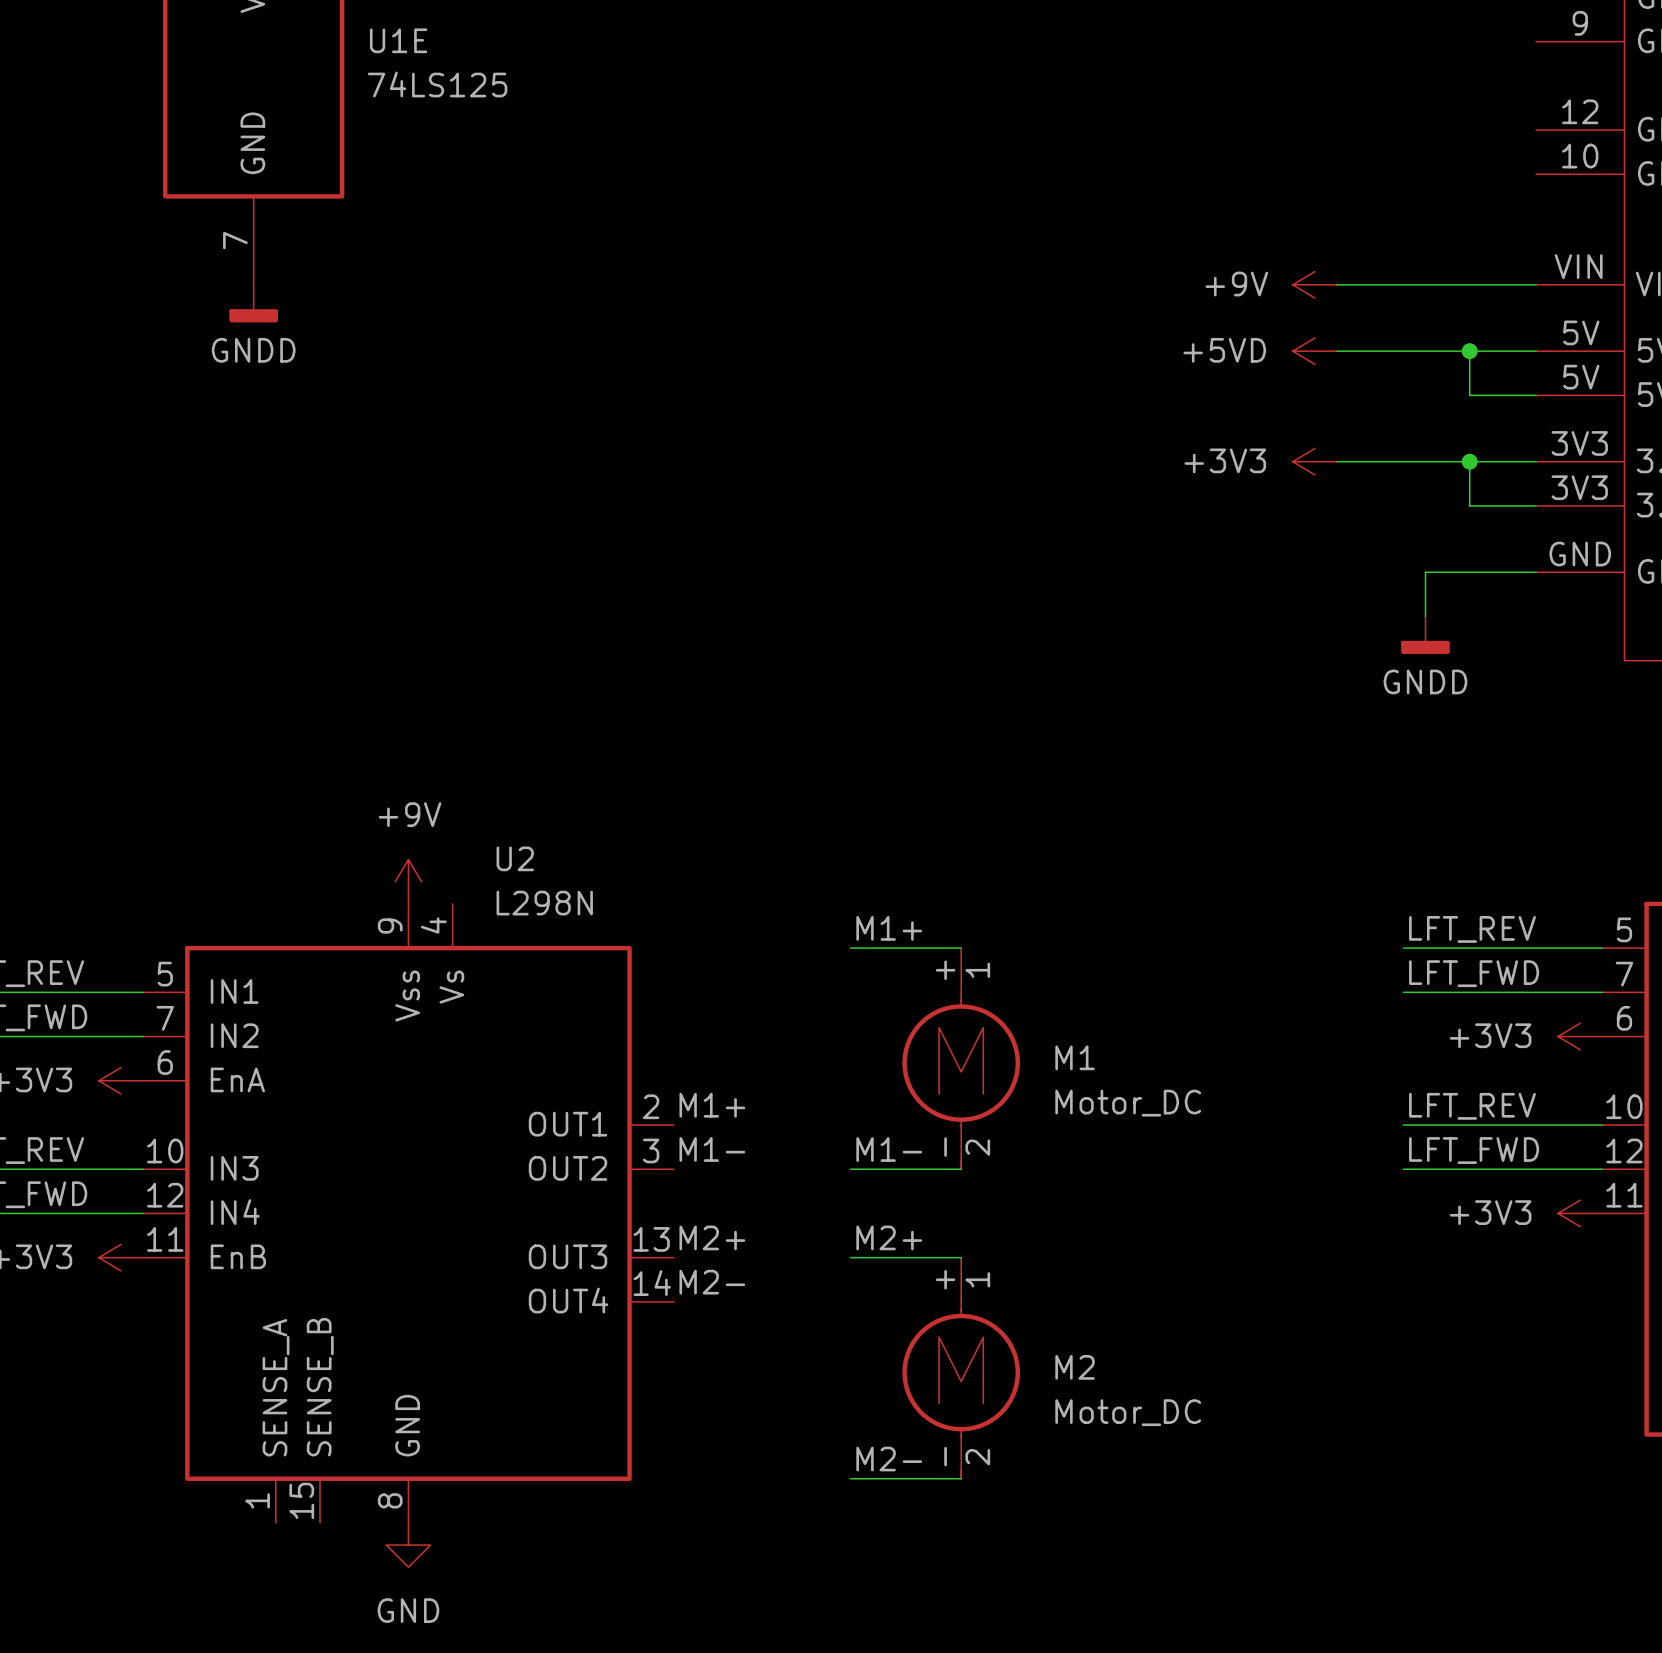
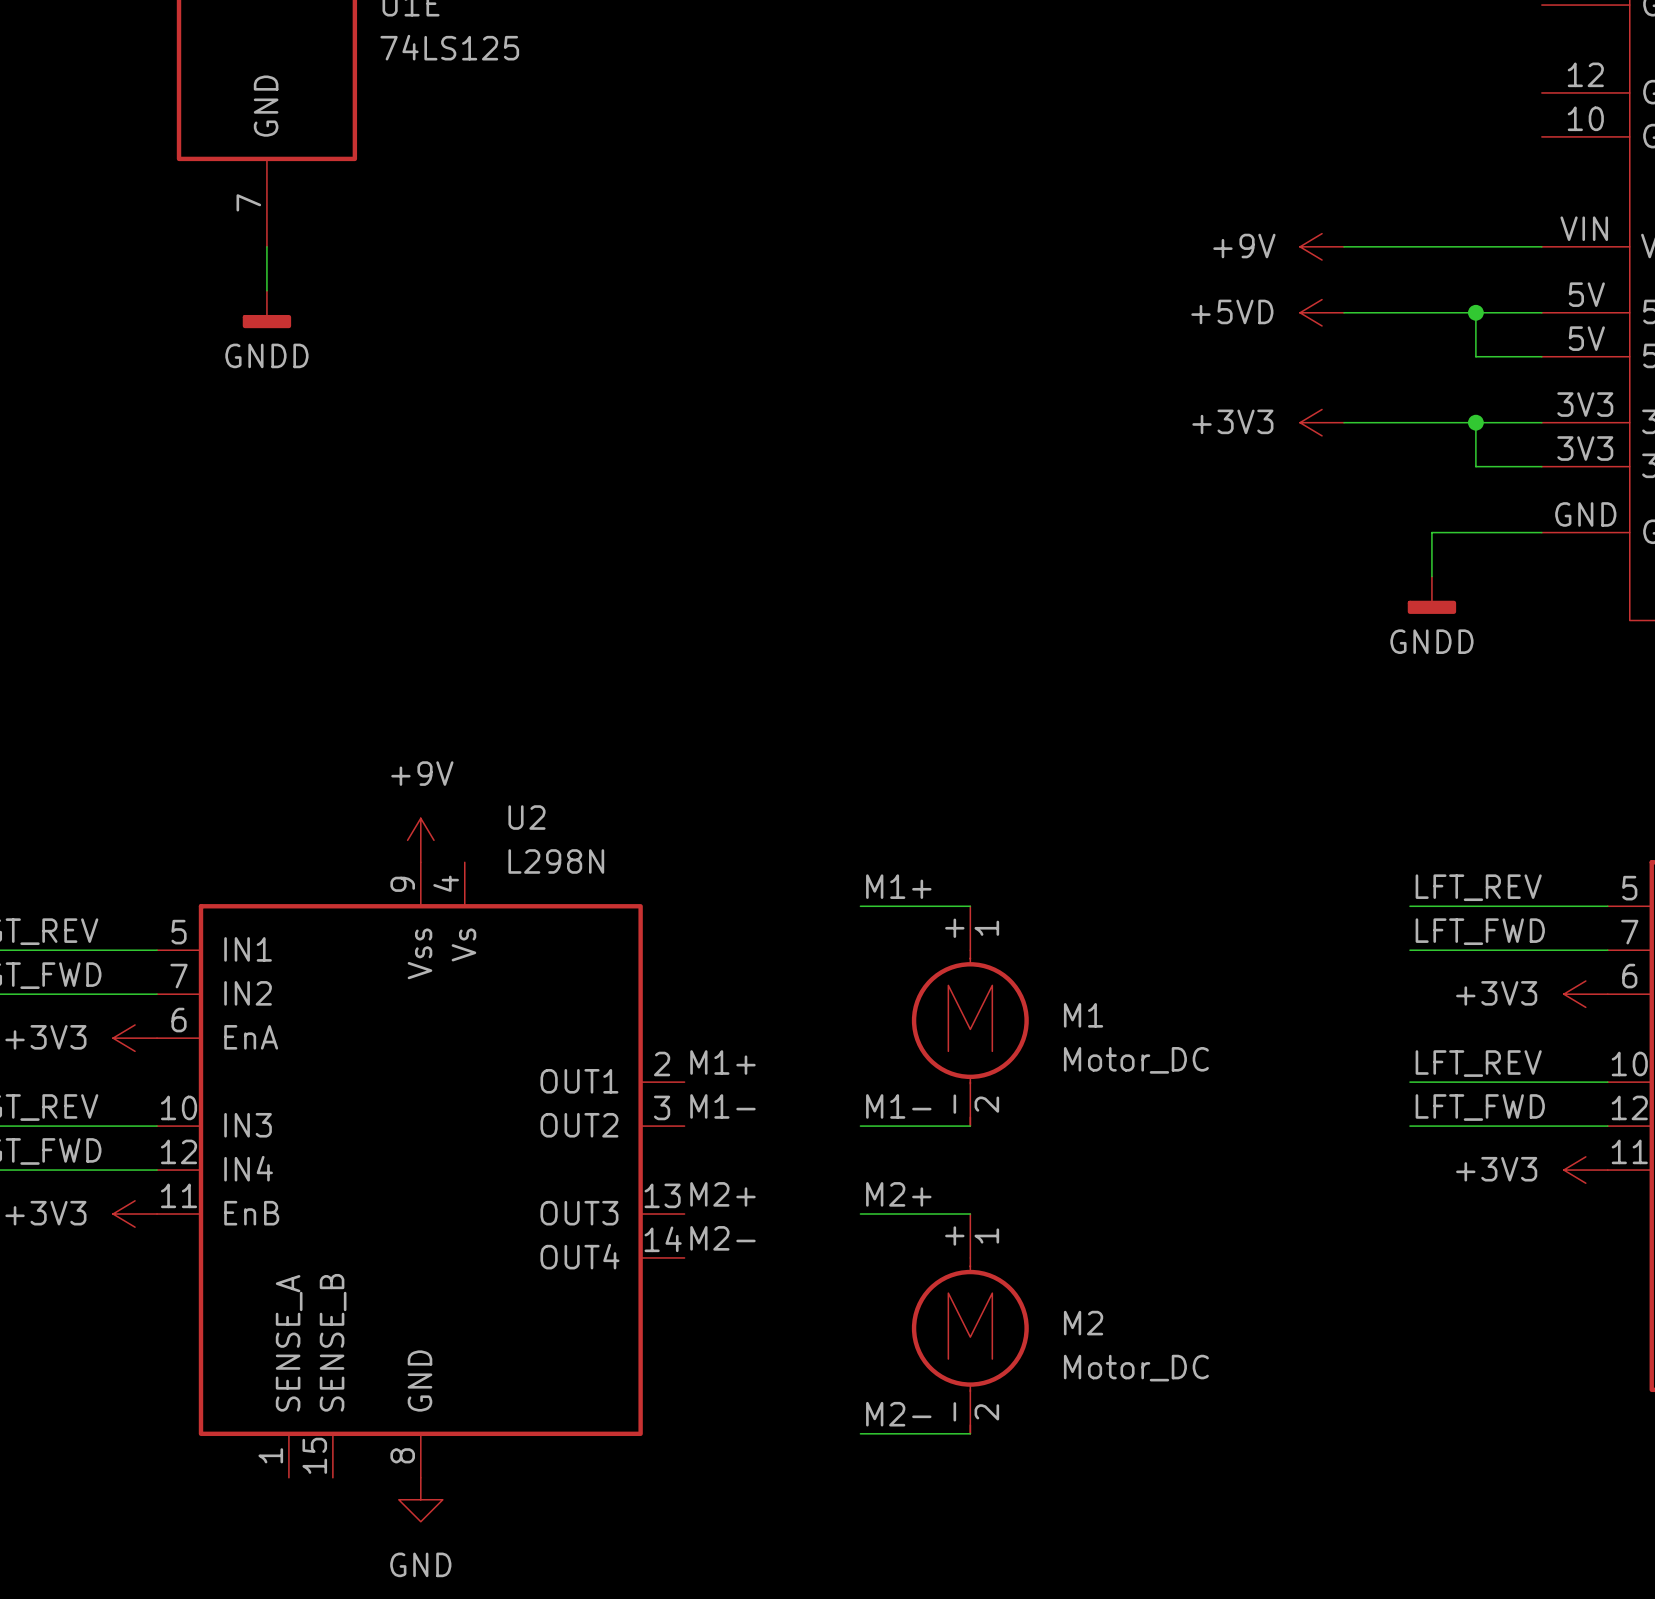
power symbol position: GNDD (253, 303) -> GNDD (266, 309)

